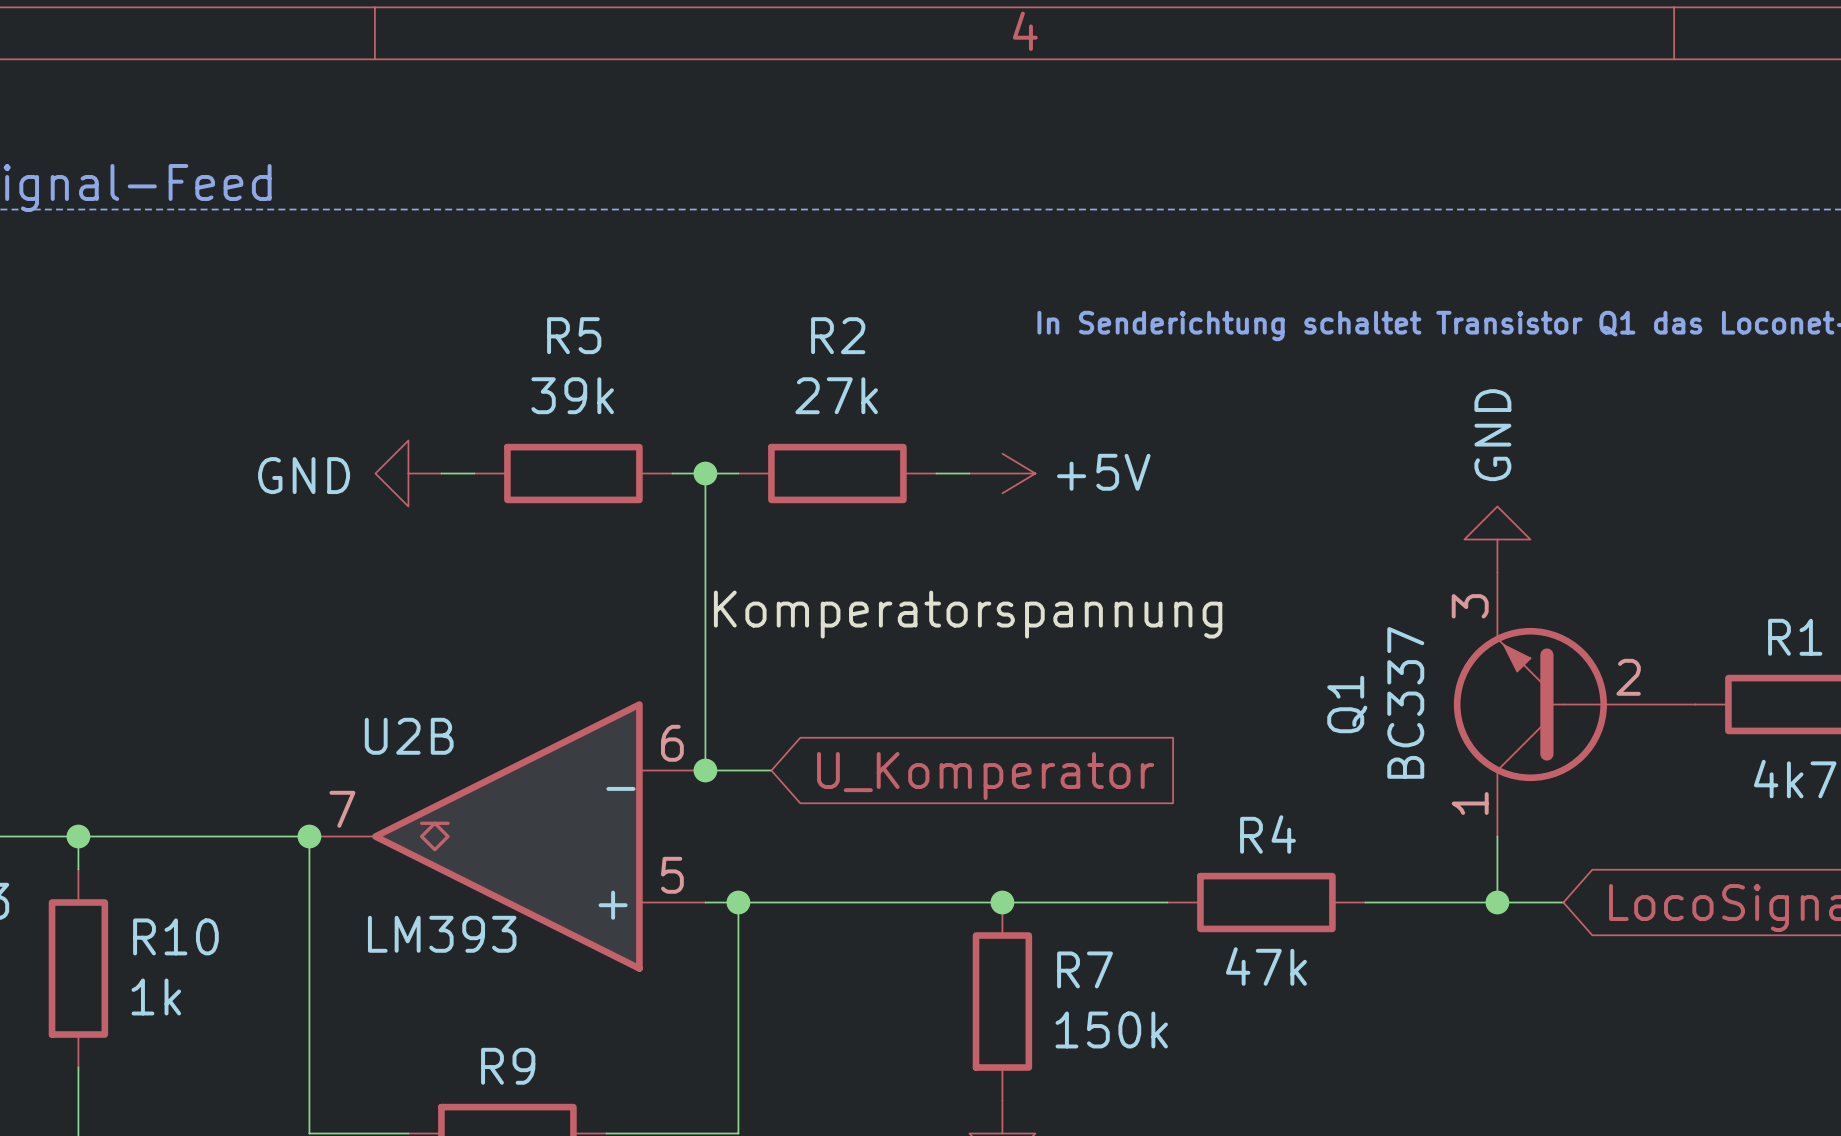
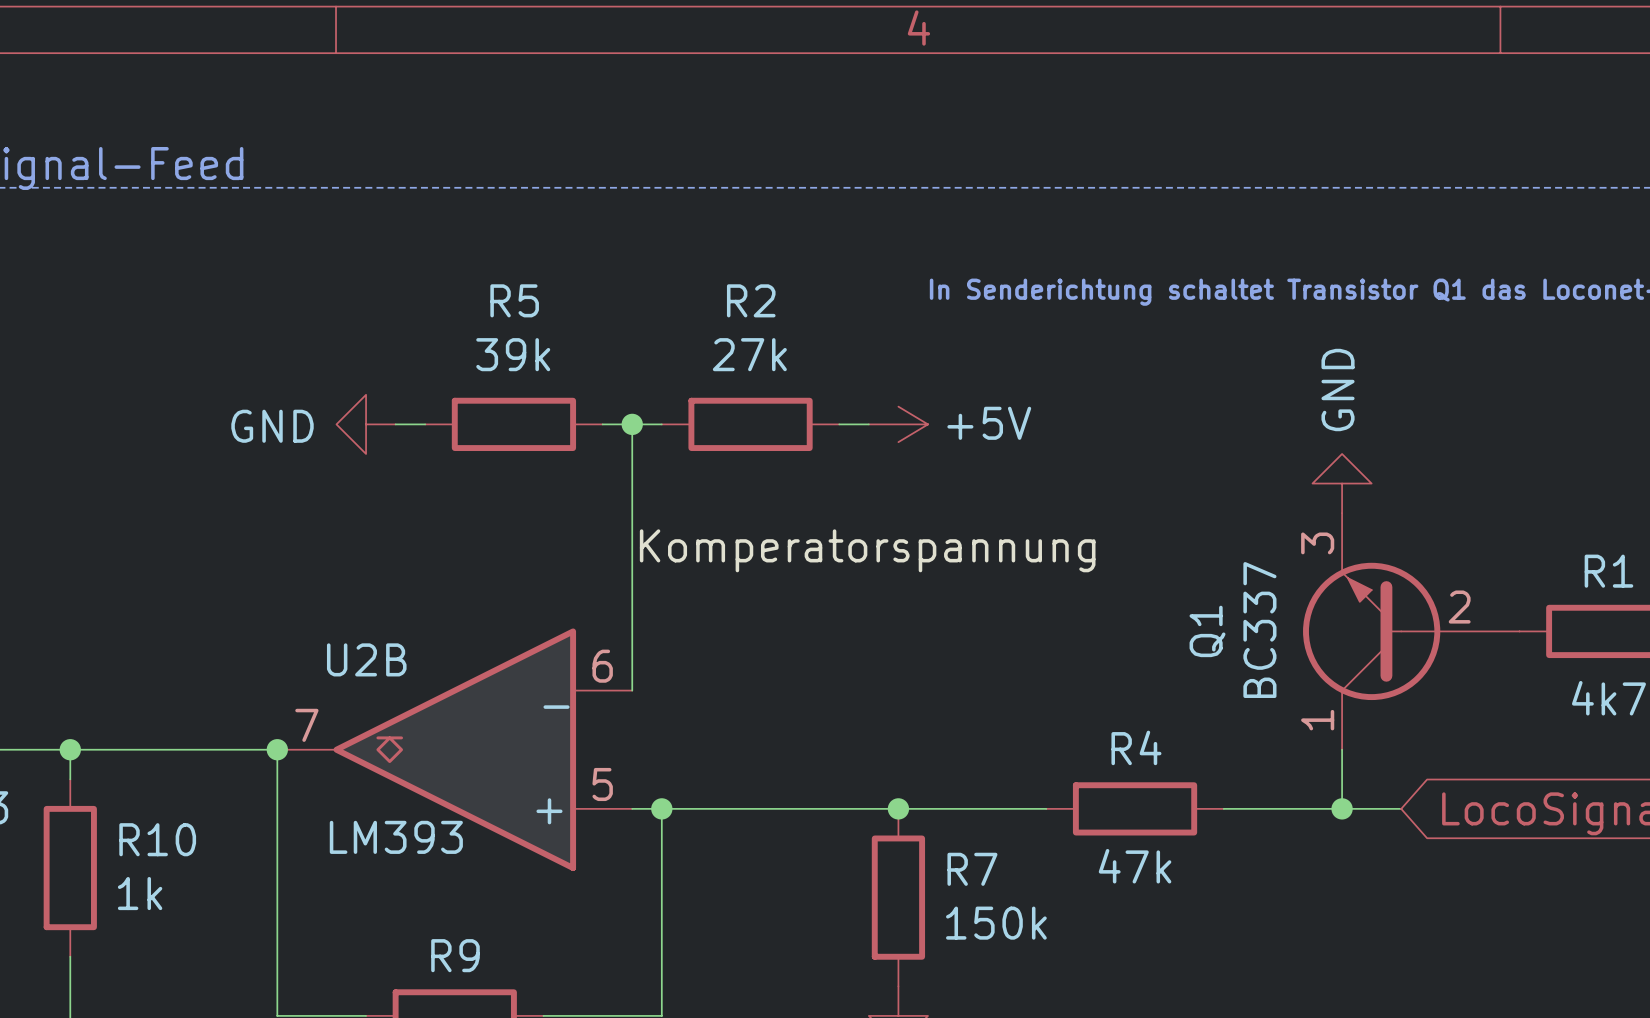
wire: (705, 770) (771, 770) -> none
junction: (705, 770) -> none
global label: U_Komperator (985, 776) -> none

